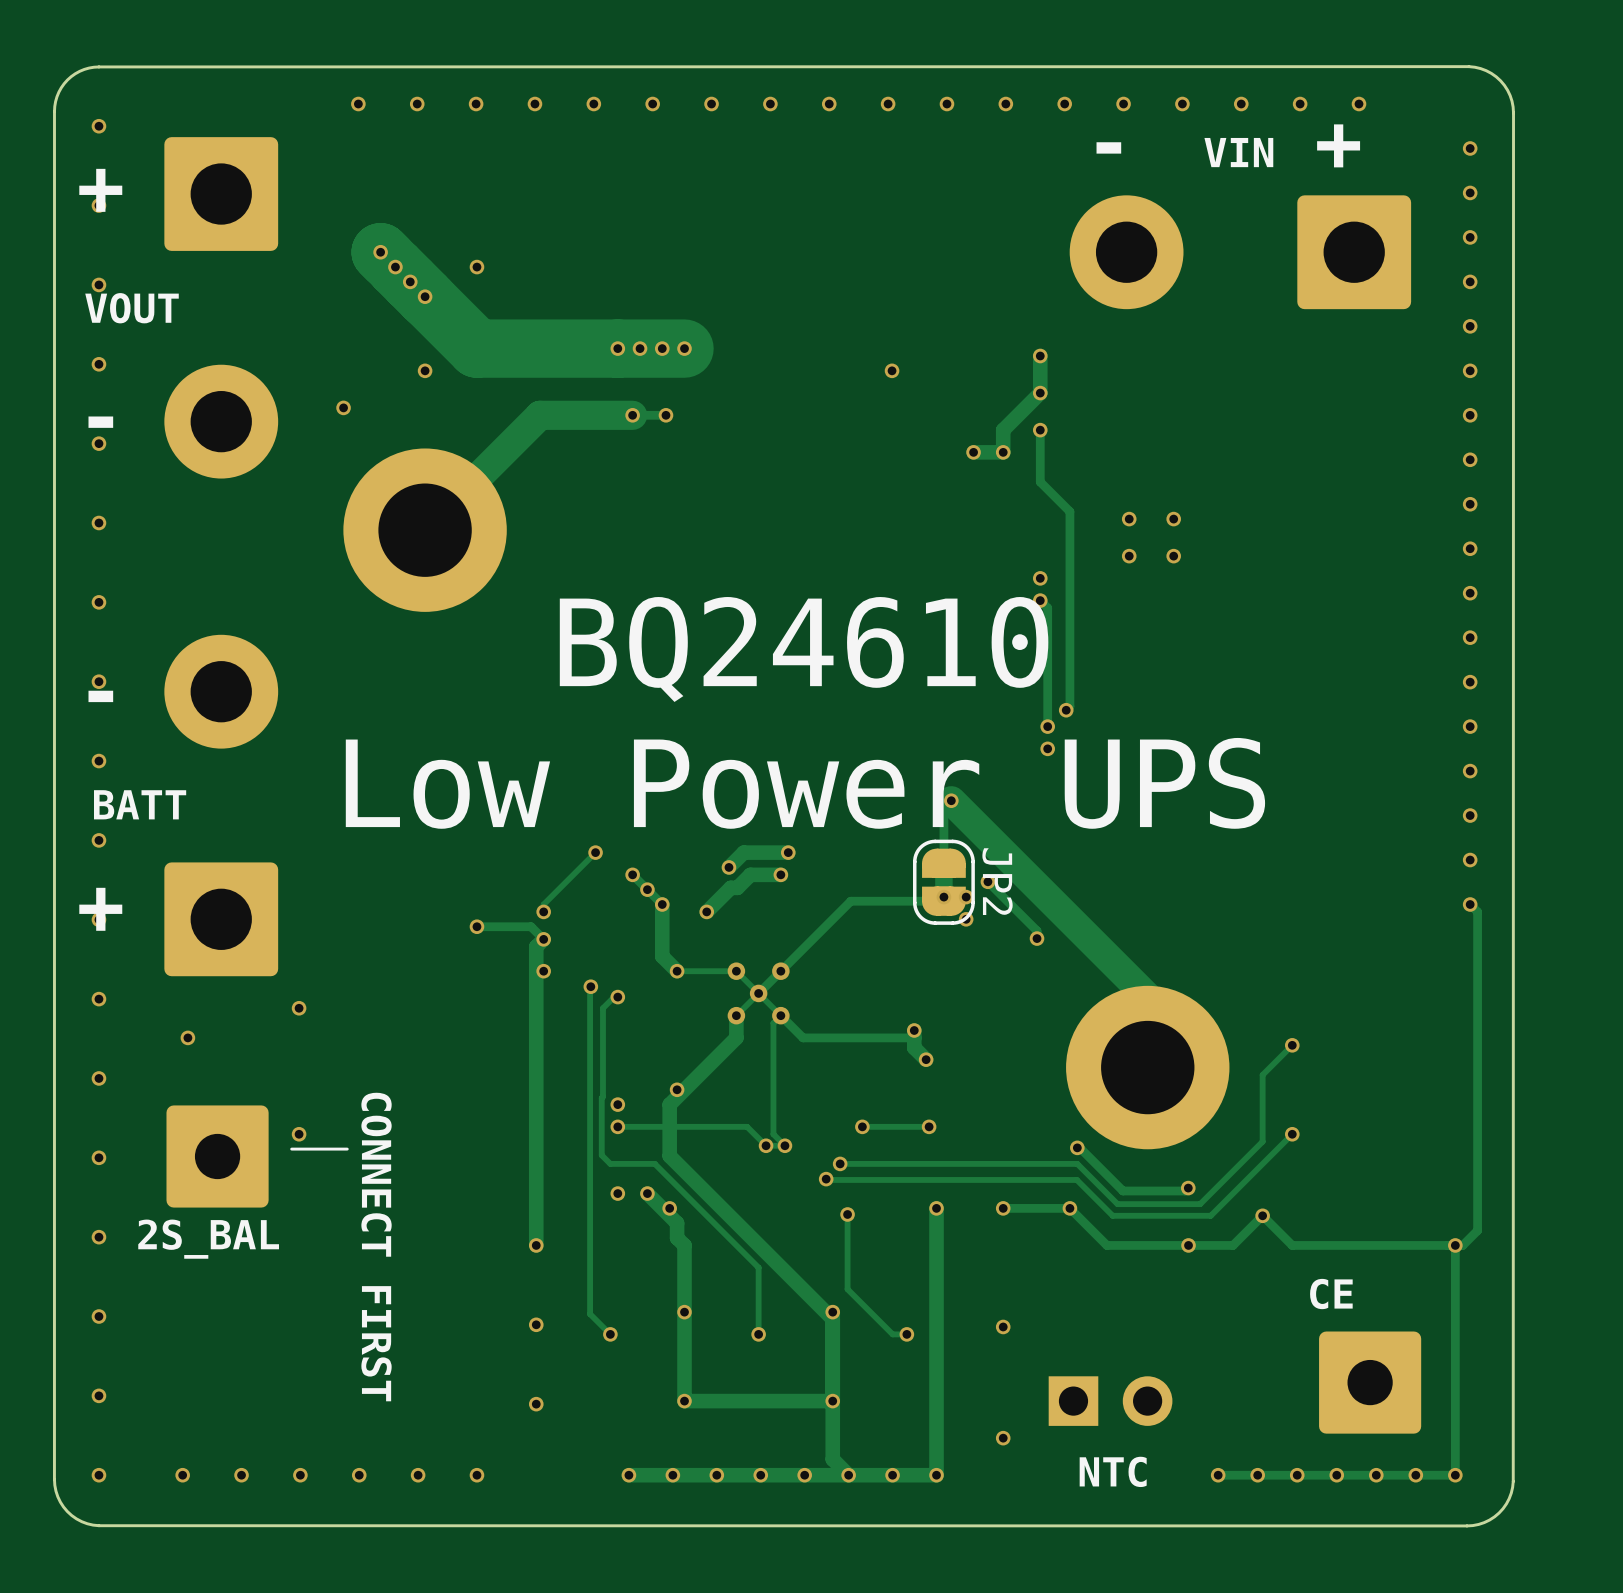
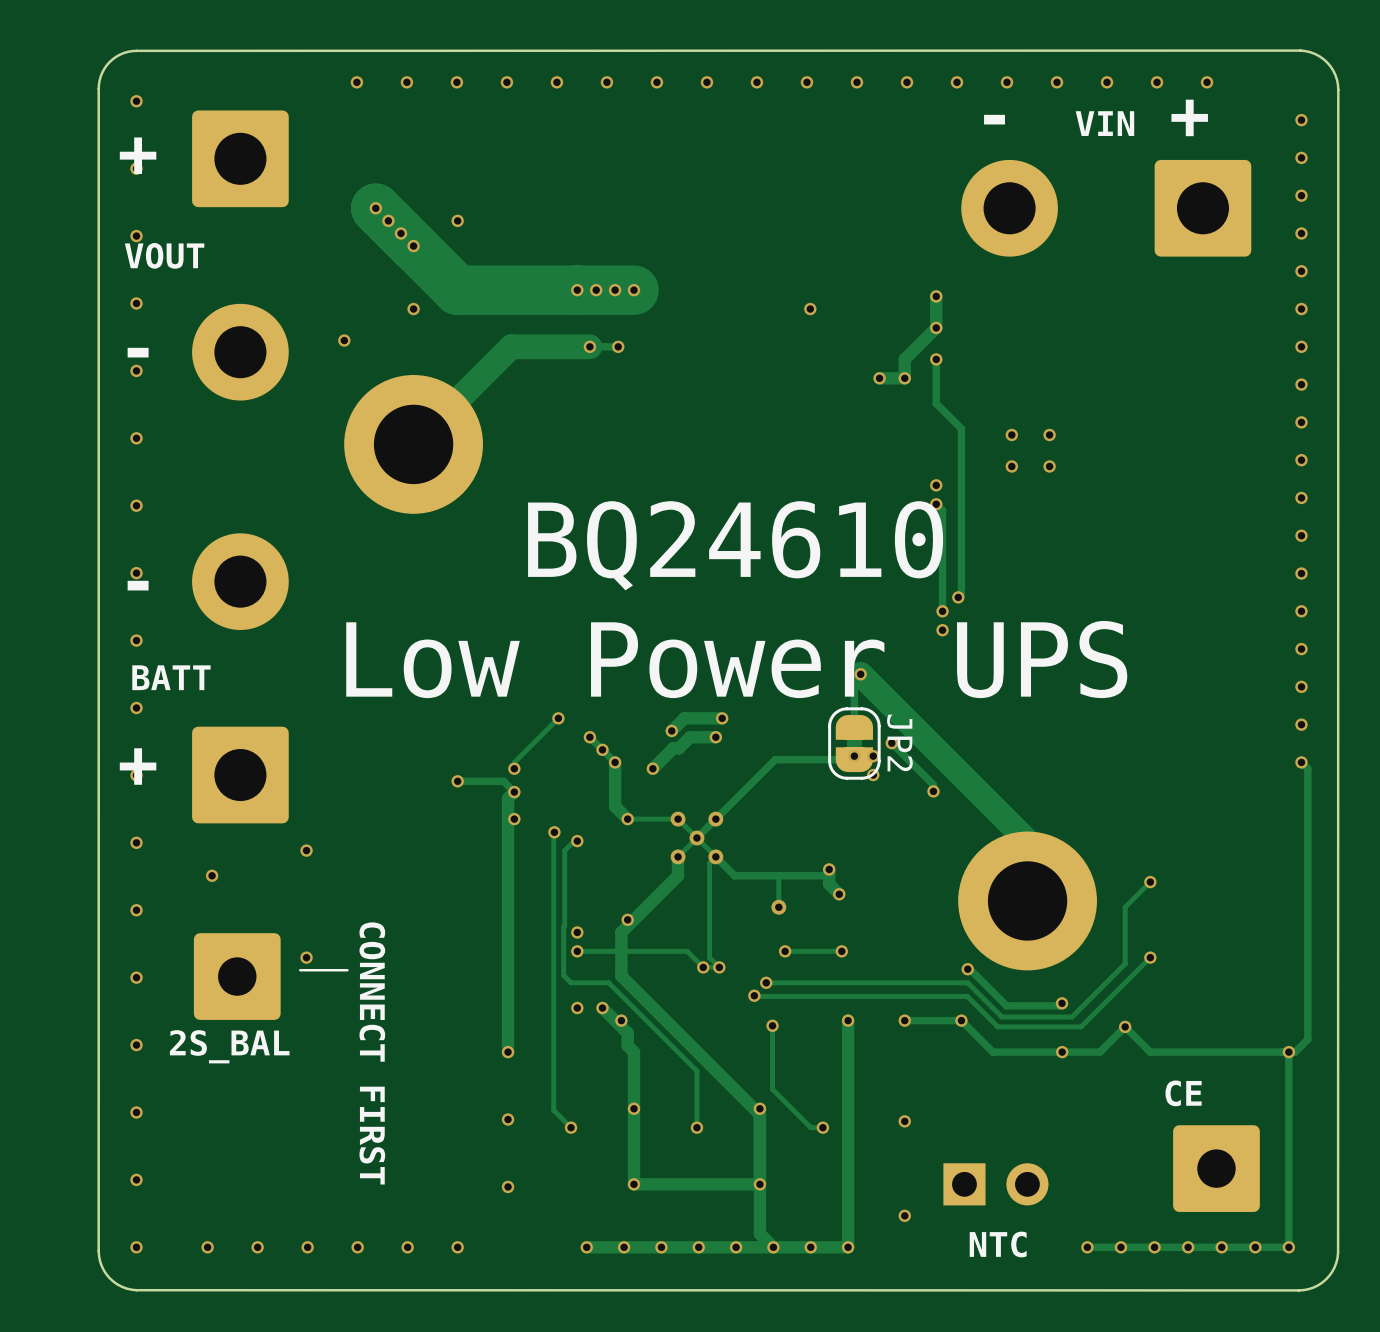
track: none -> (778, 875) (778, 907)
via: none -> (778, 907)

